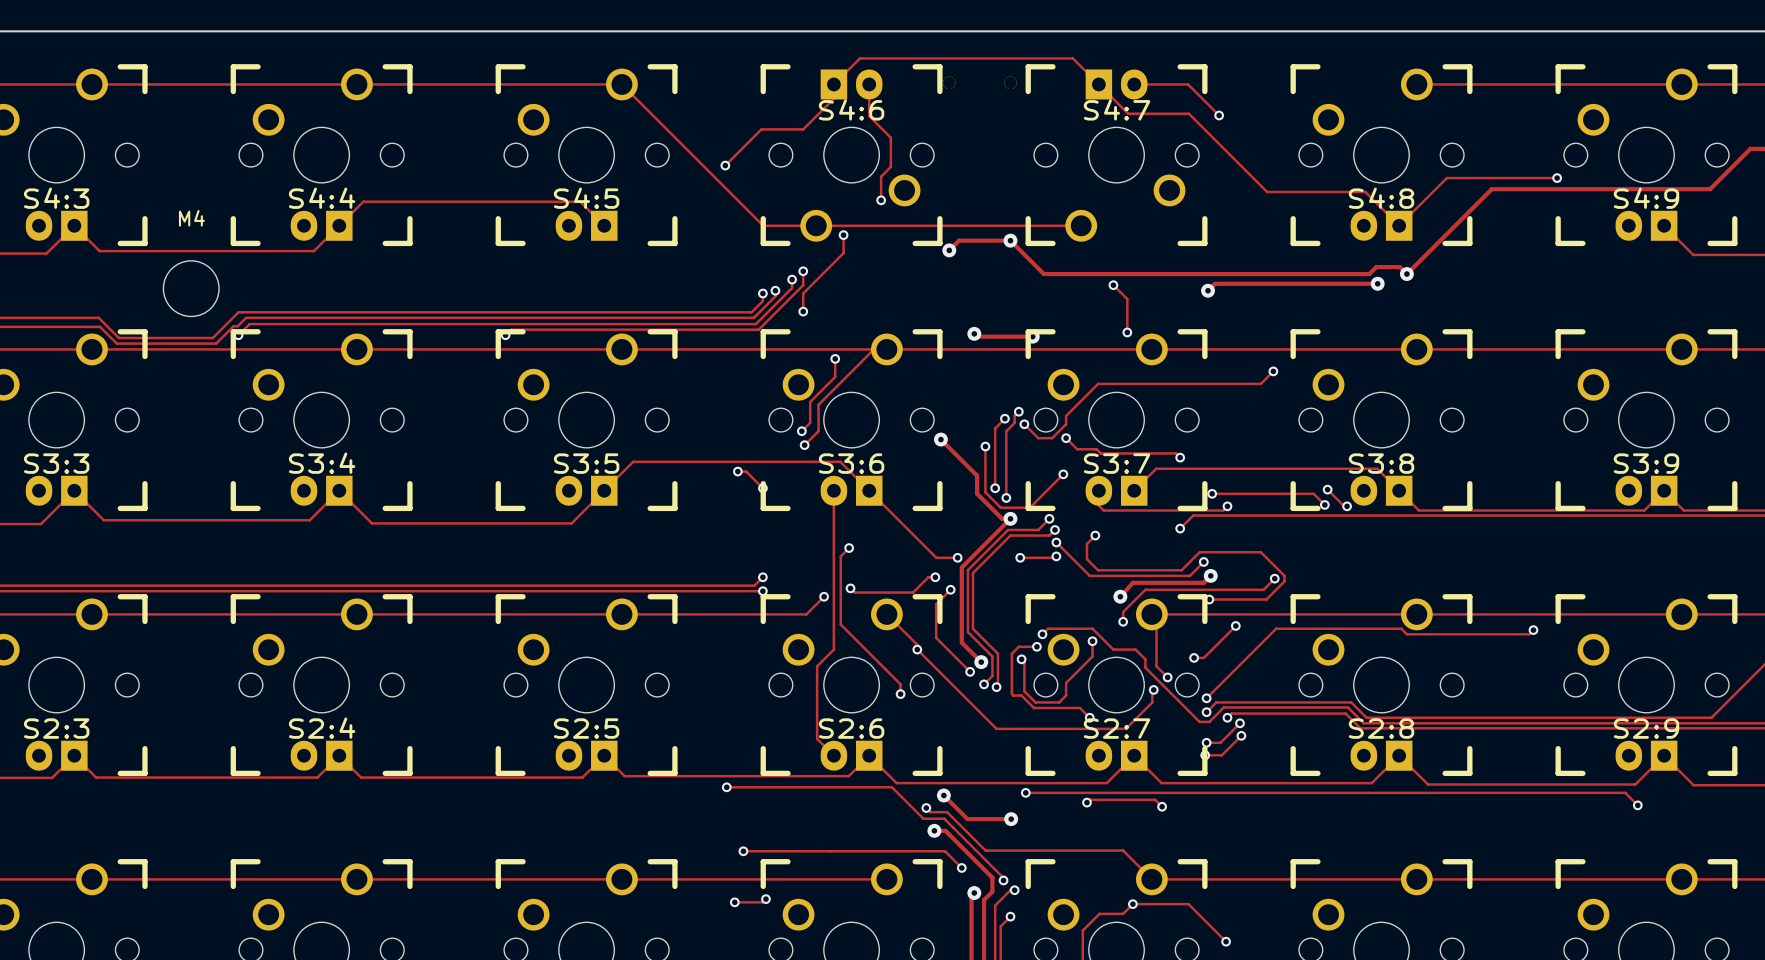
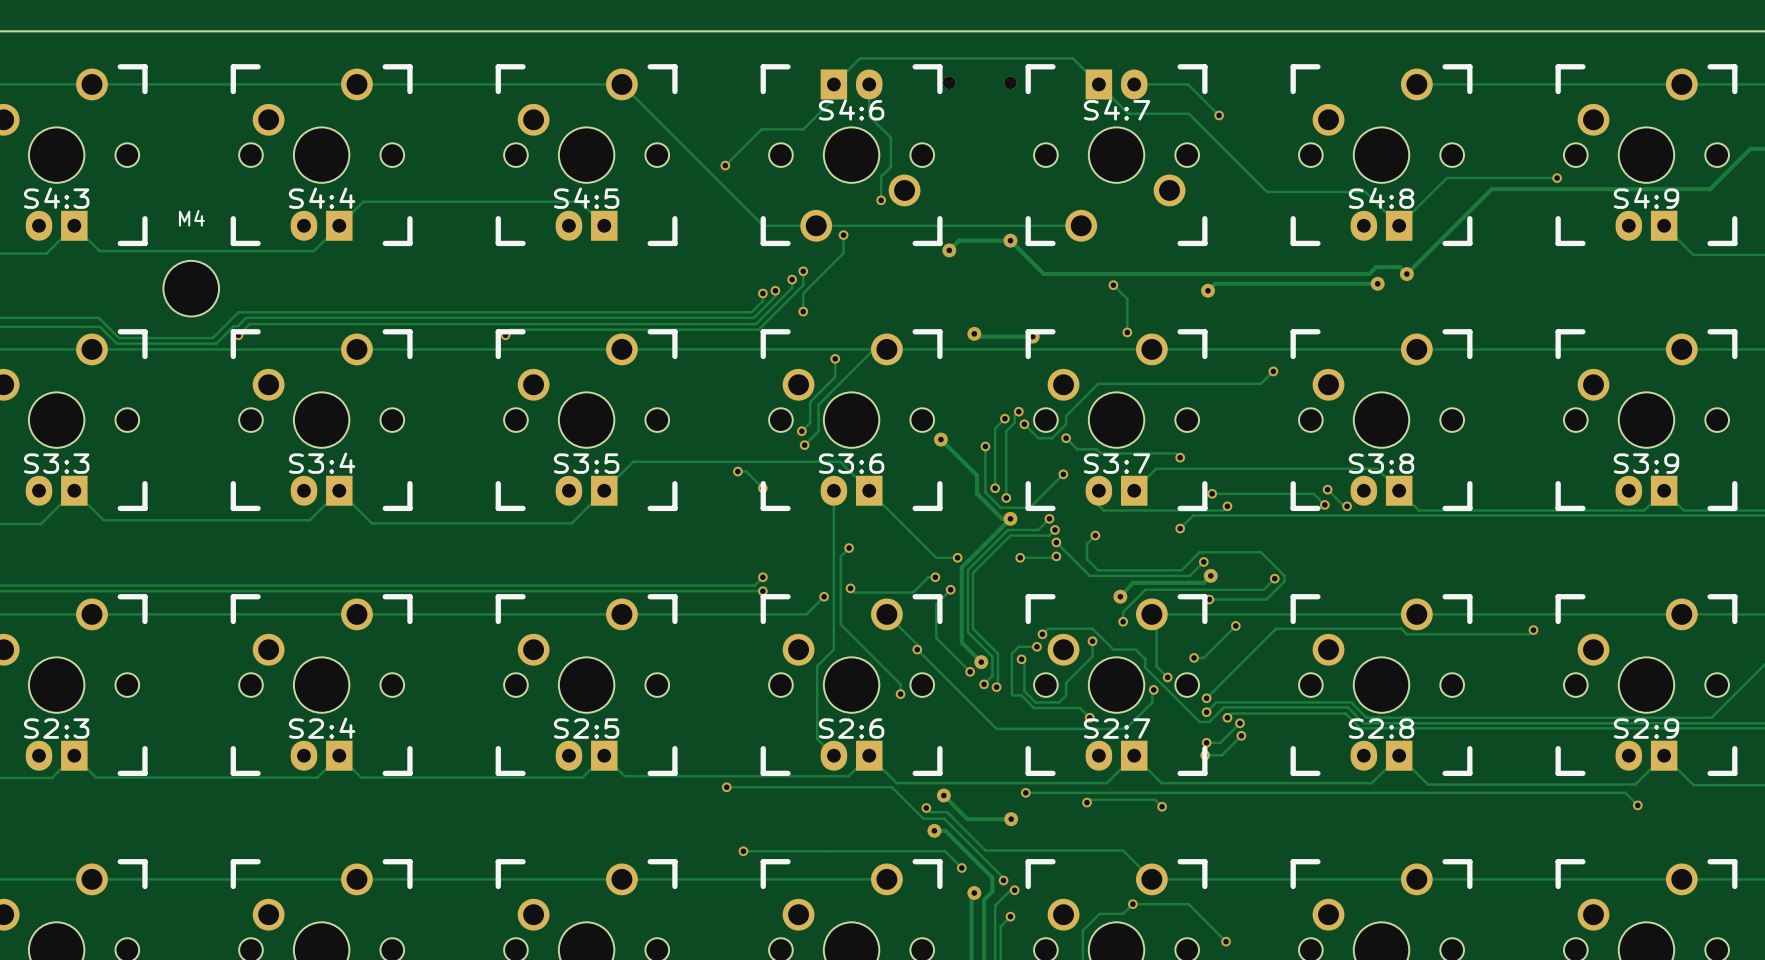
track: (765, 899) (762, 902) (734, 902) -> none
via: (765, 899) -> none
via: (734, 902) -> none

